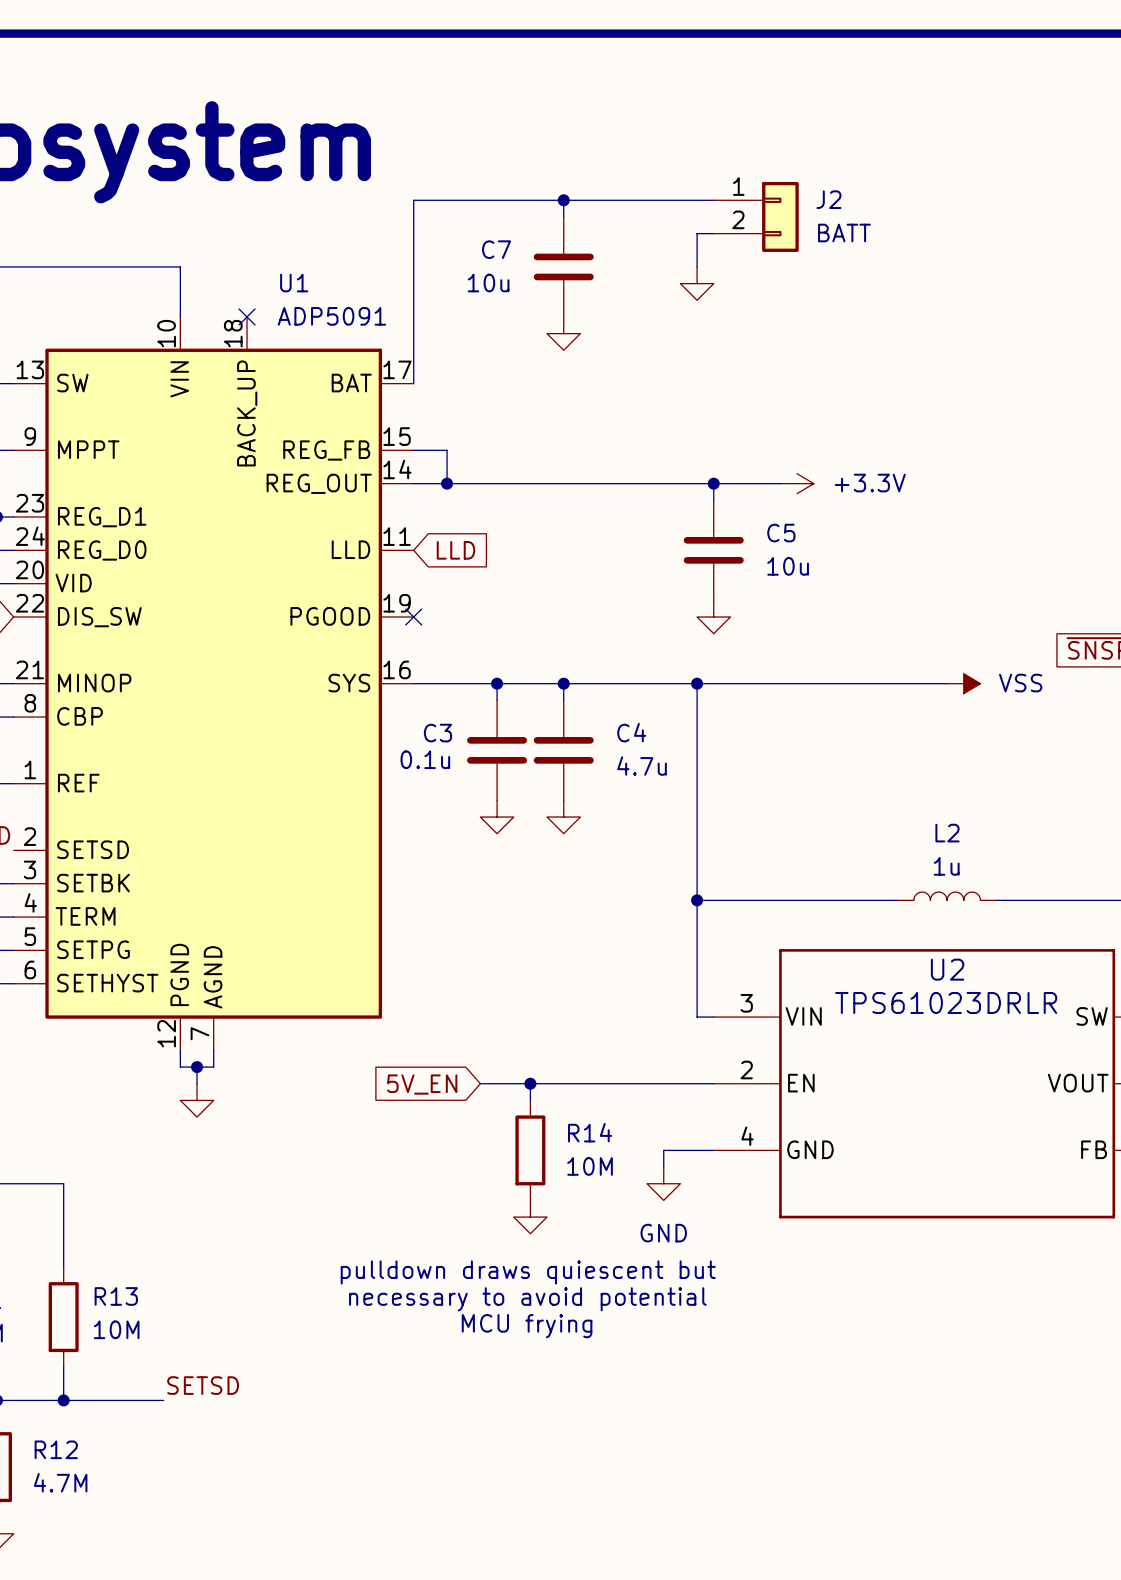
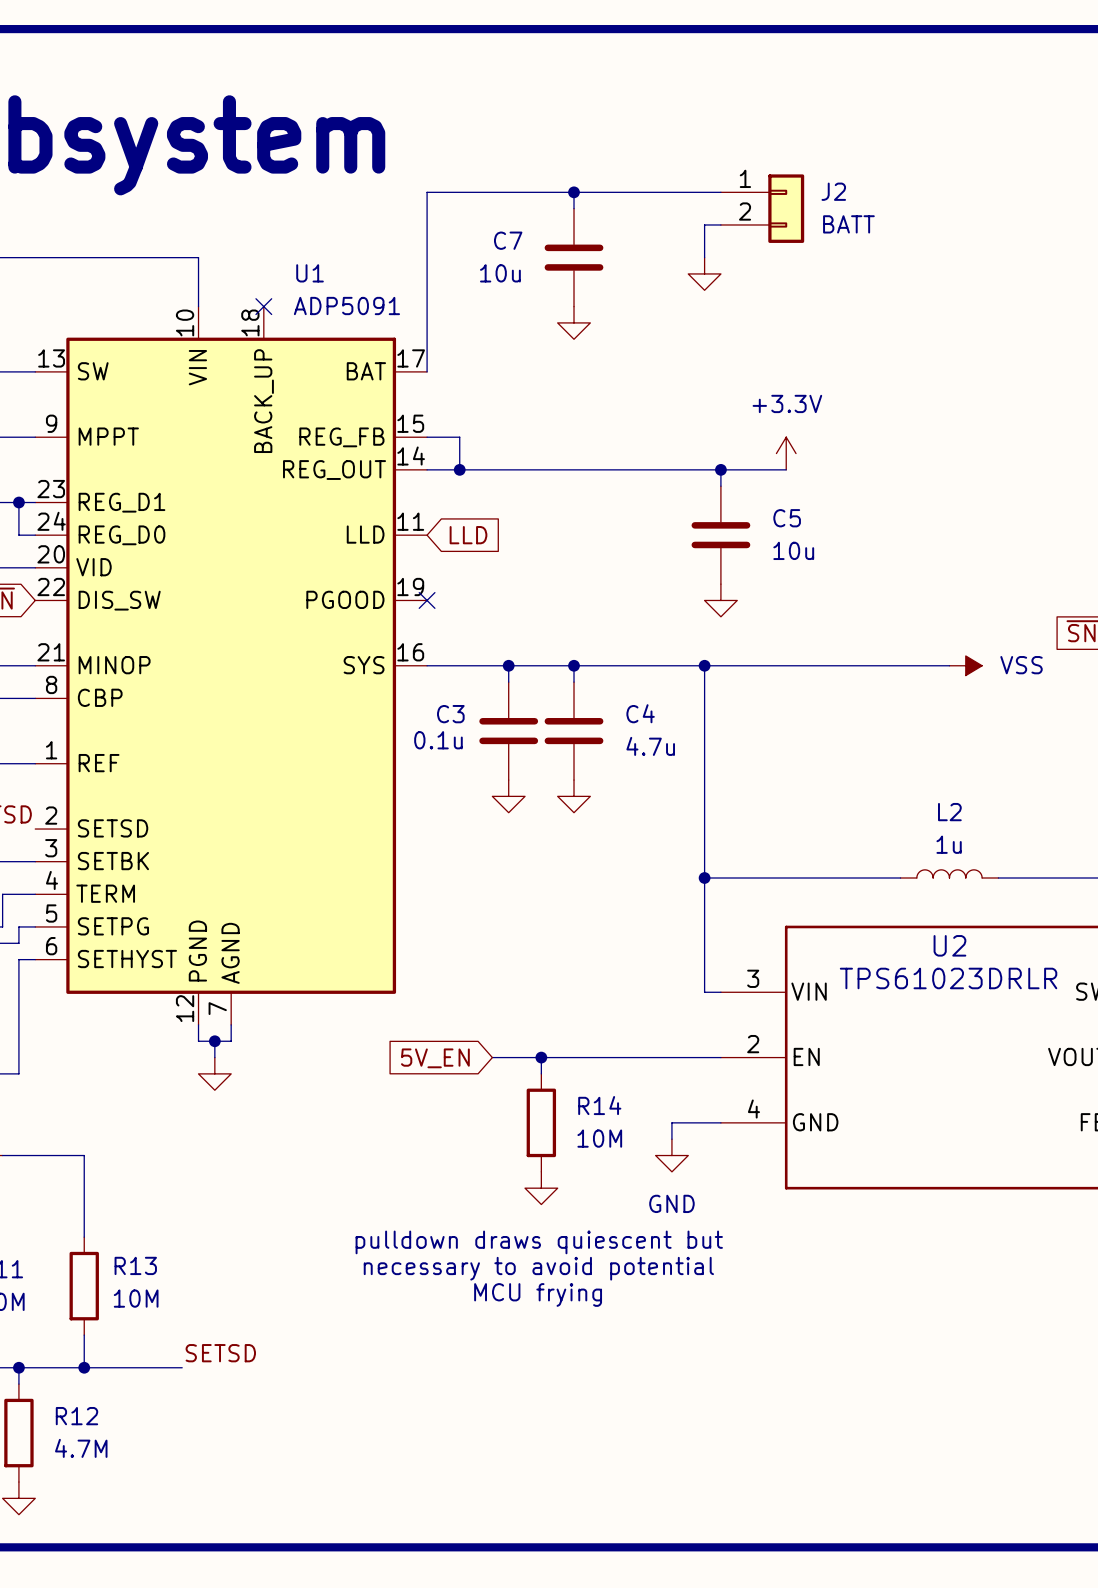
power symbol rotation: 0° (797, 483) -> 90° counterclockwise (786, 453)
power symbol position: +3.3V (797, 483) -> +3.3V (786, 453)
power symbol text position: +3.3V (870, 483) -> +3.3V (787, 403)

